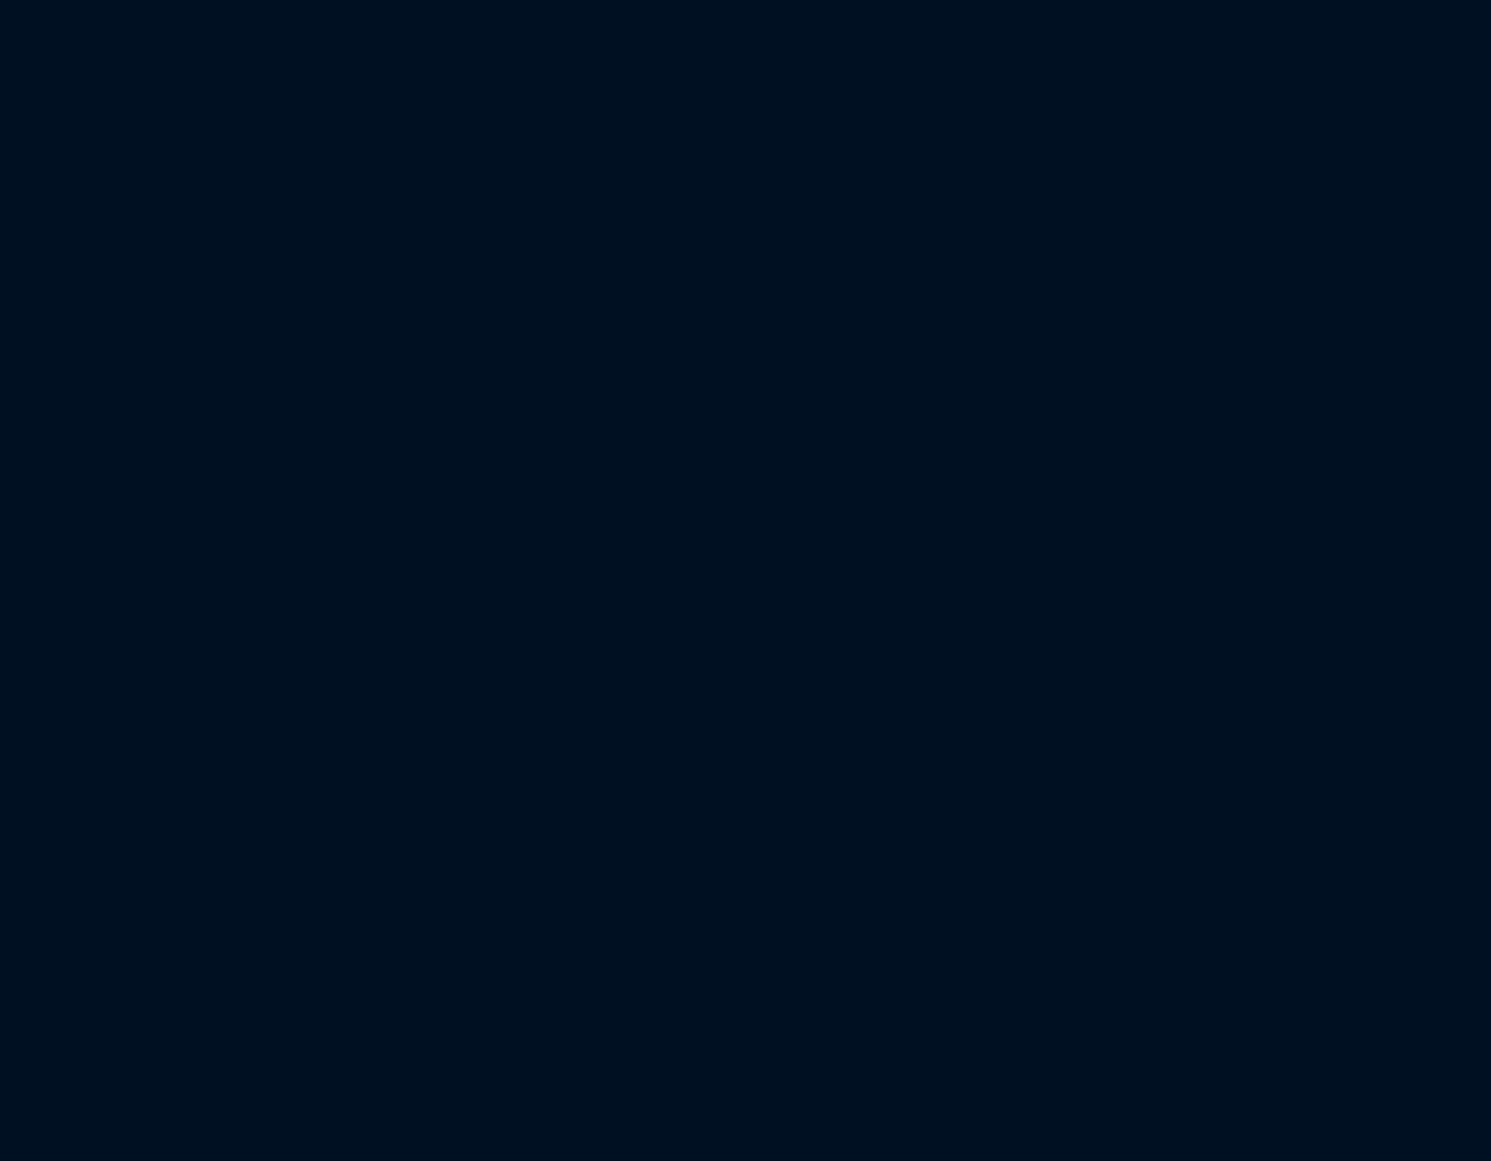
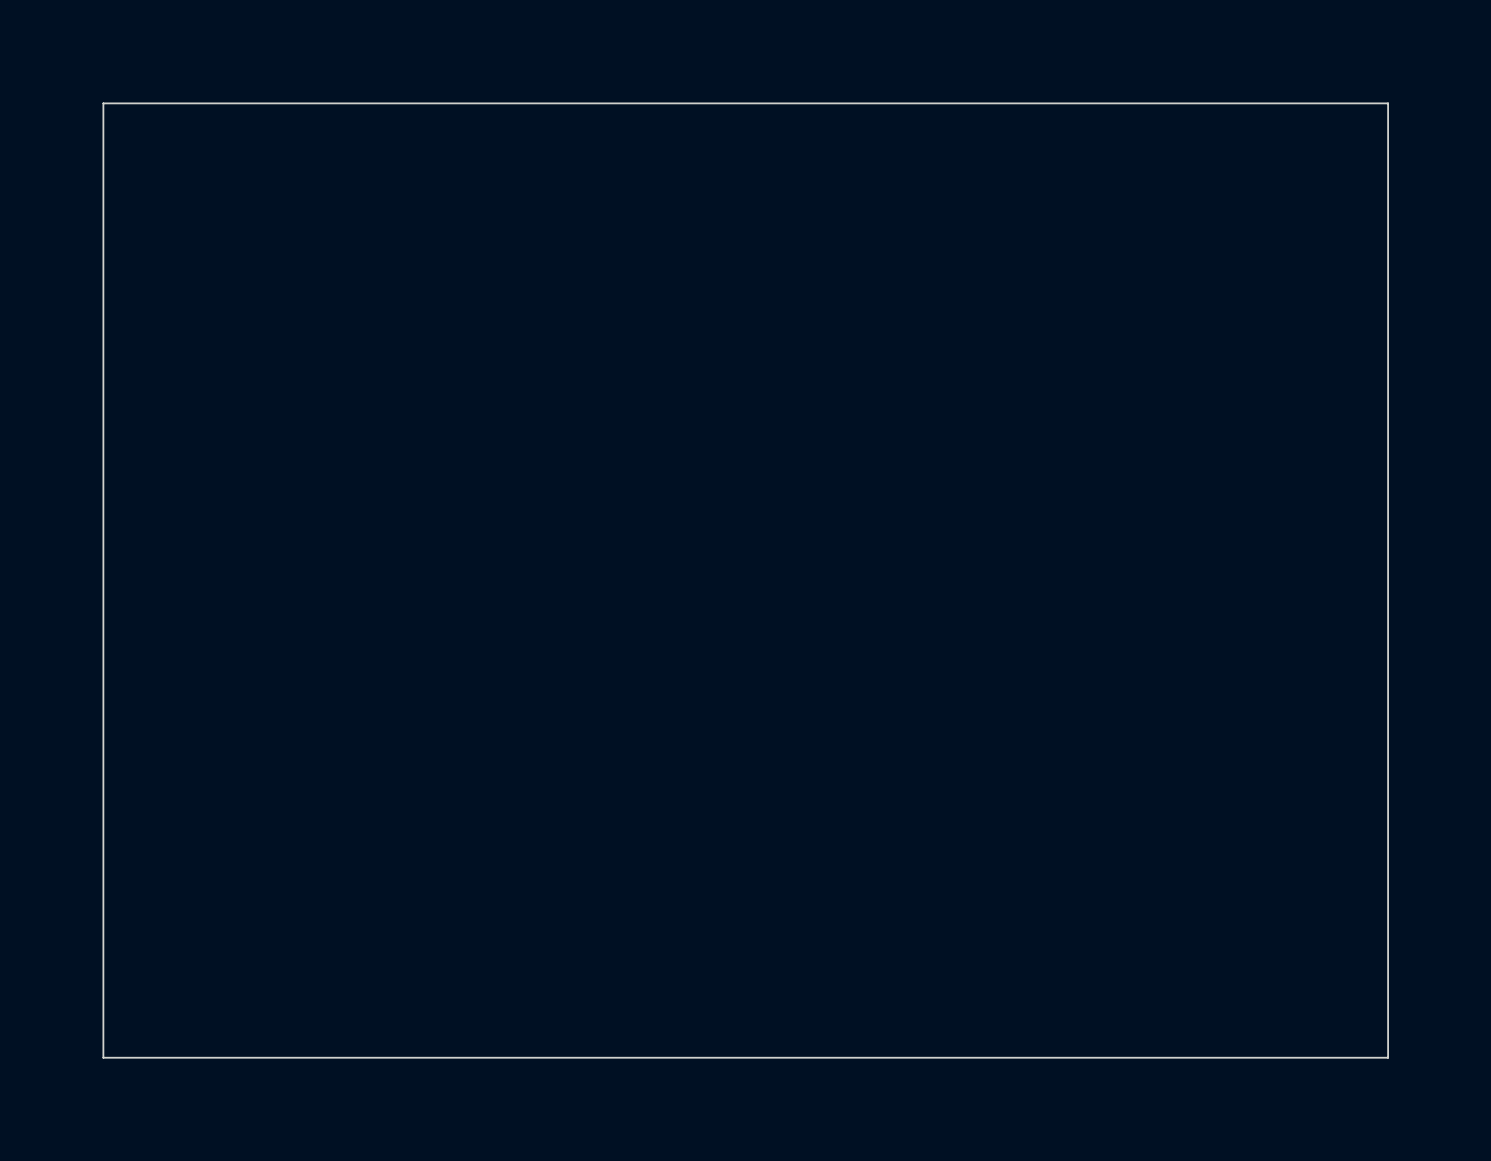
board edge: none -> (1388, 103) (103, 103) (103, 1057) (1388, 1057) (1388, 103)

